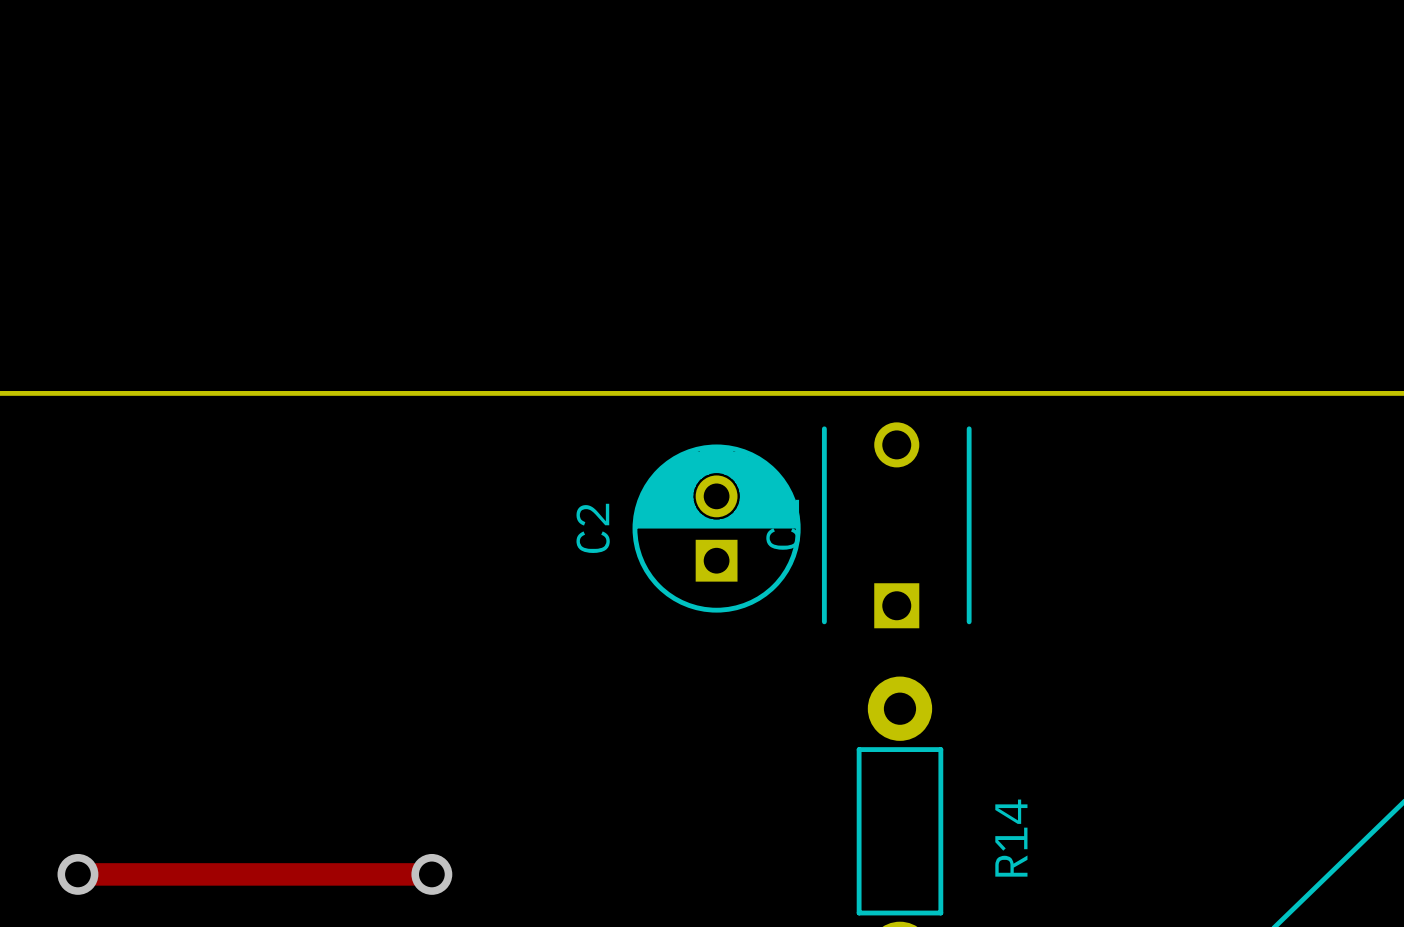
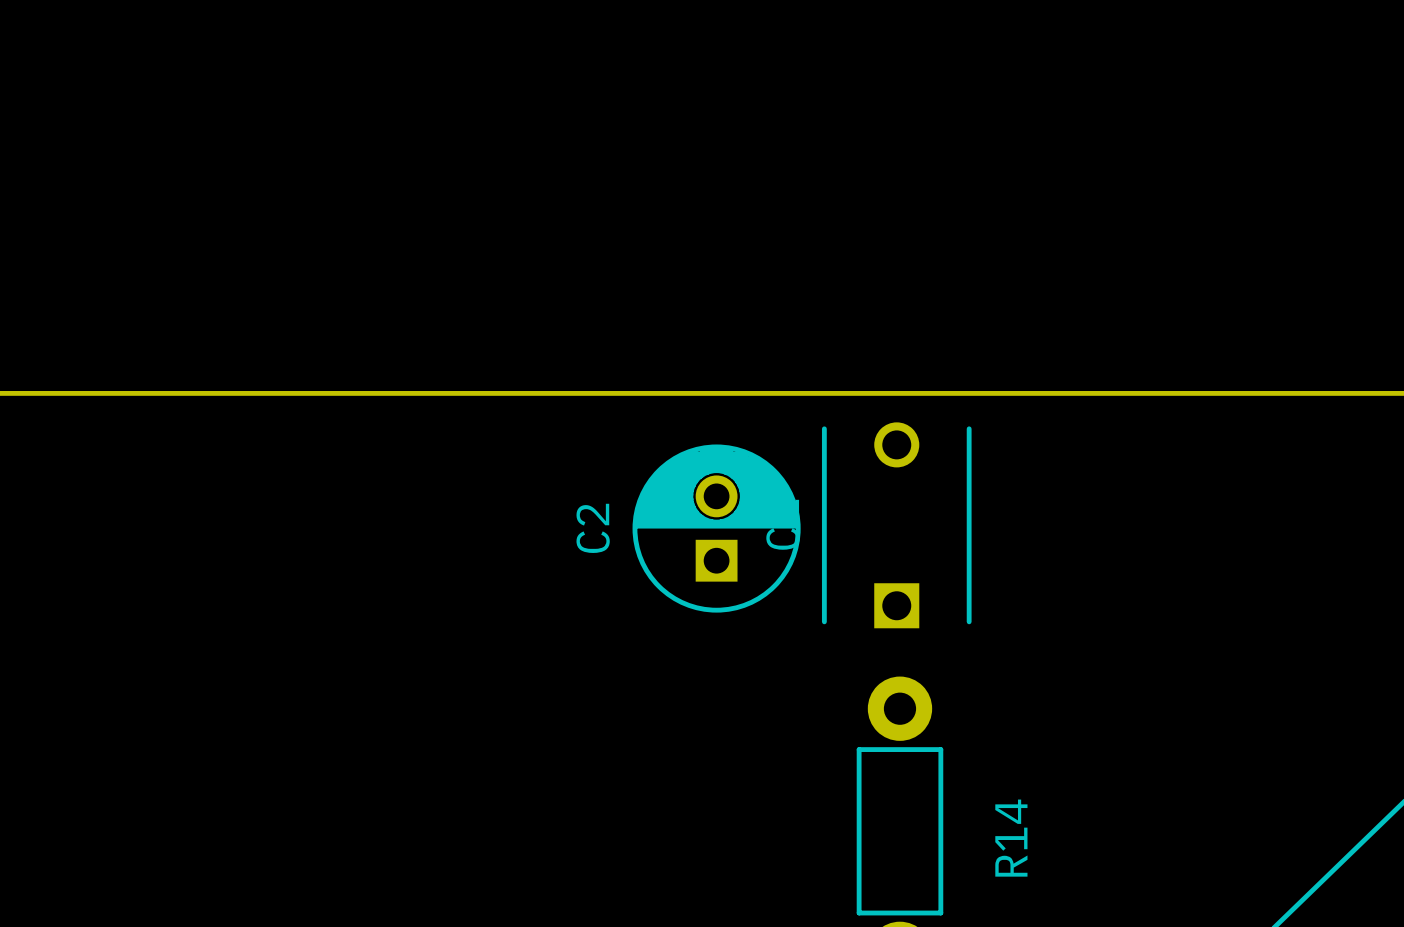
track: (77, 874) (431, 874) -> none
via: (77, 874) -> none
via: (431, 874) -> none

